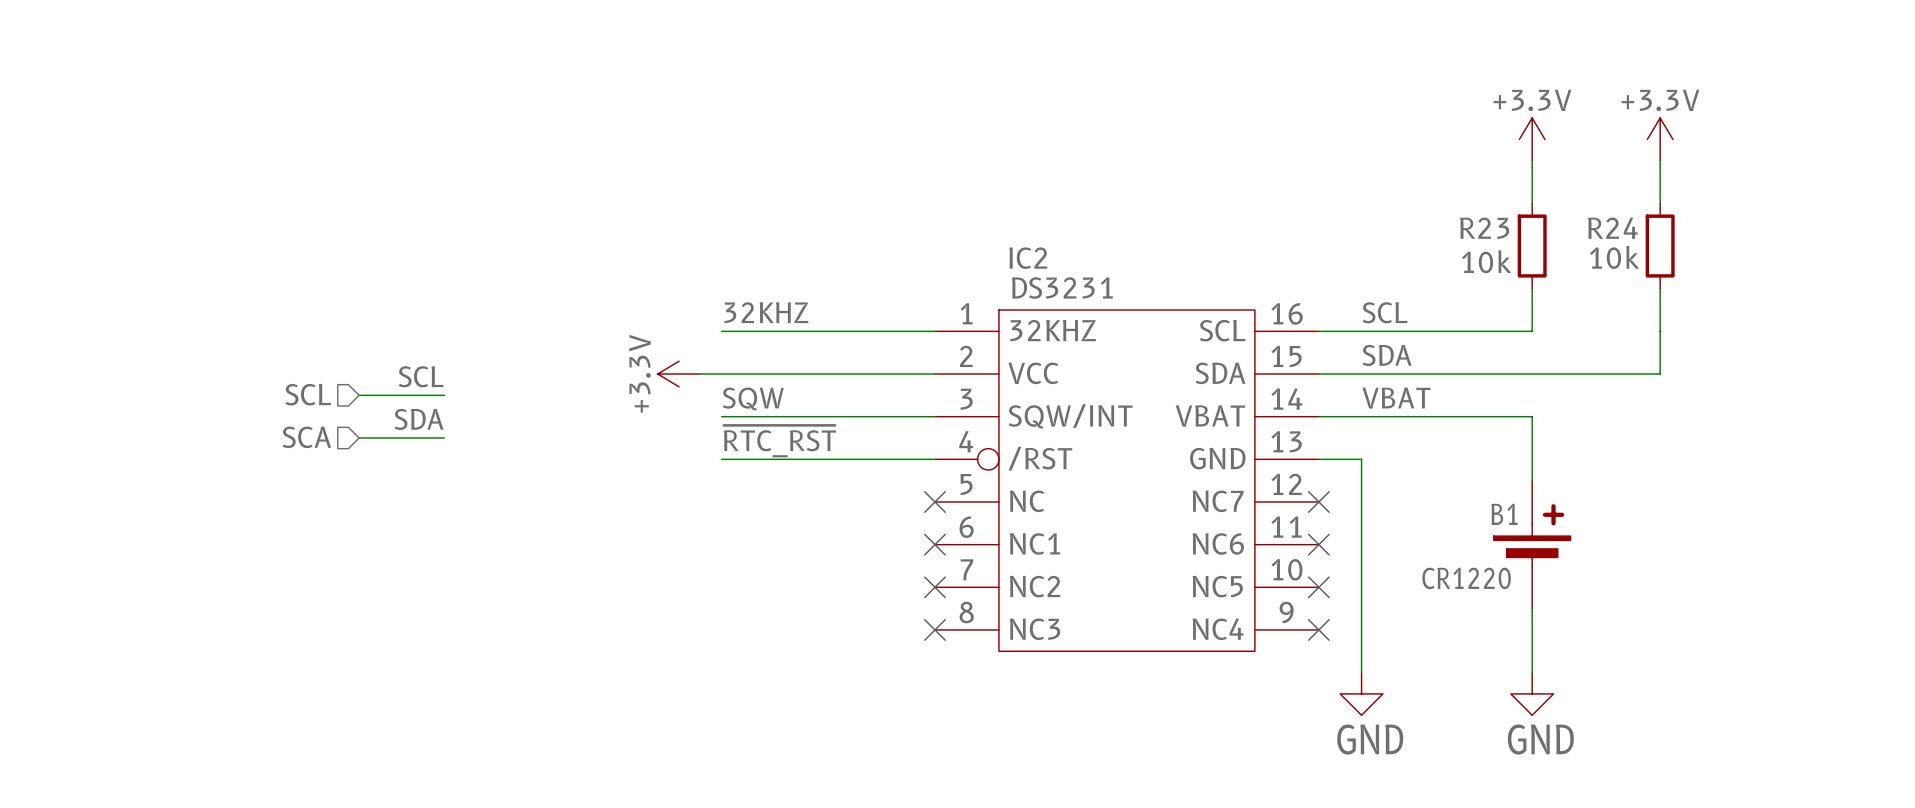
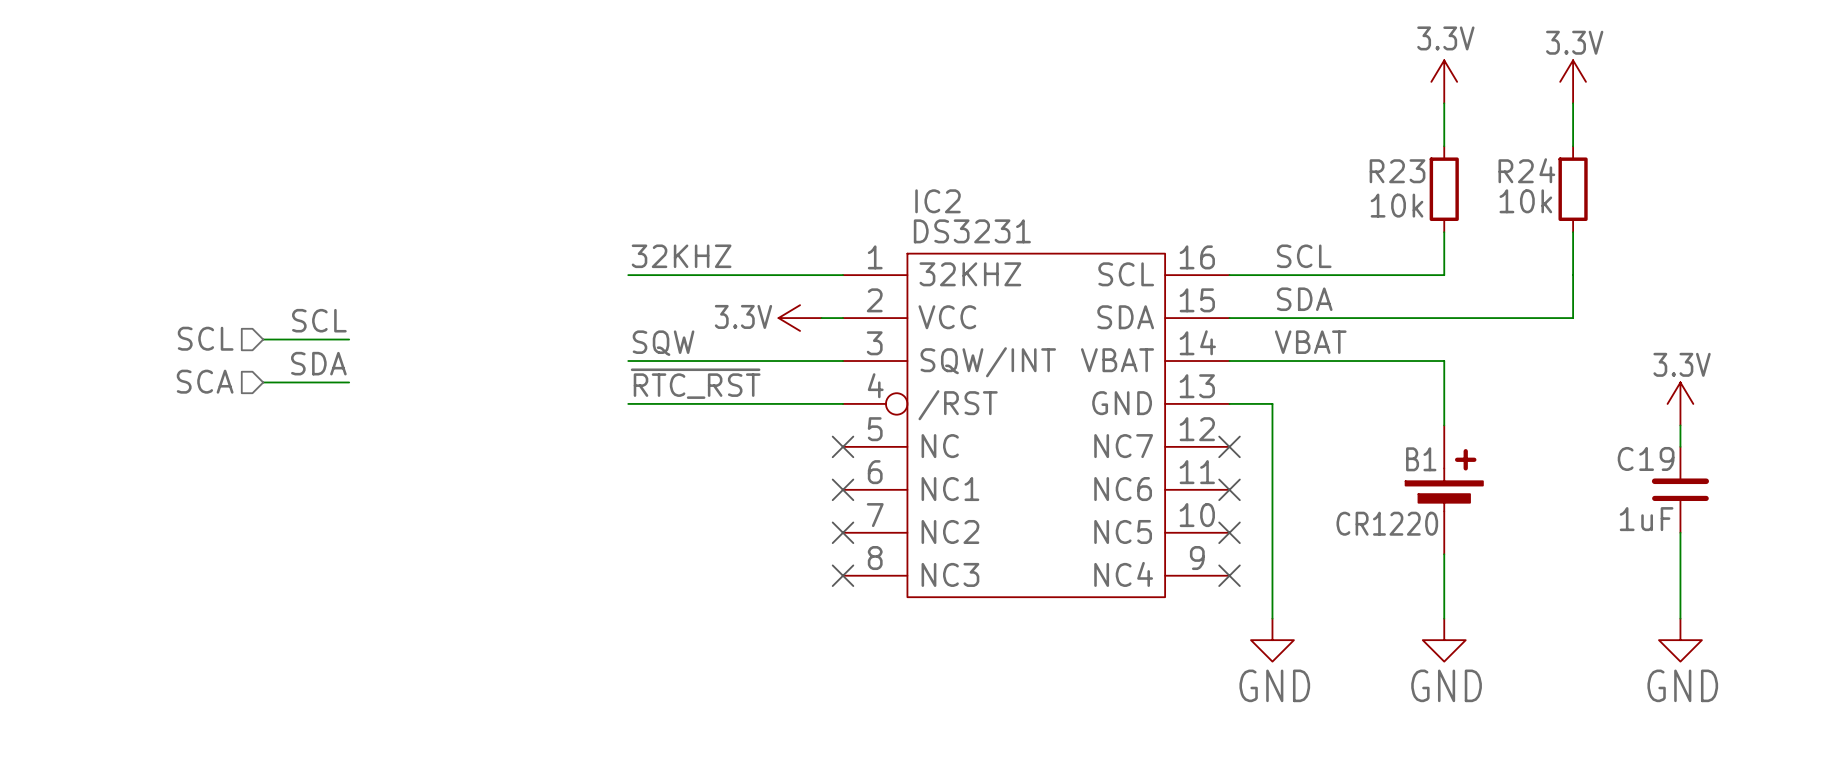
power symbol: +3.3V (1532, 139) -> 3.3V (1444, 81)
power symbol: +3.3V (1660, 139) -> 3.3V (1573, 81)
power symbol: +3.3V (679, 374) -> none
wire: (700, 374) (913, 374) -> none
power symbol: none -> 3.3V (800, 318)
power symbol: none -> 3.3V (1680, 403)
wire: none -> (1680, 425) (1680, 446)
C19: none -> 1uF (1680, 489)
wire: none -> (1680, 532) (1680, 618)
power symbol: none -> GND (1680, 640)

